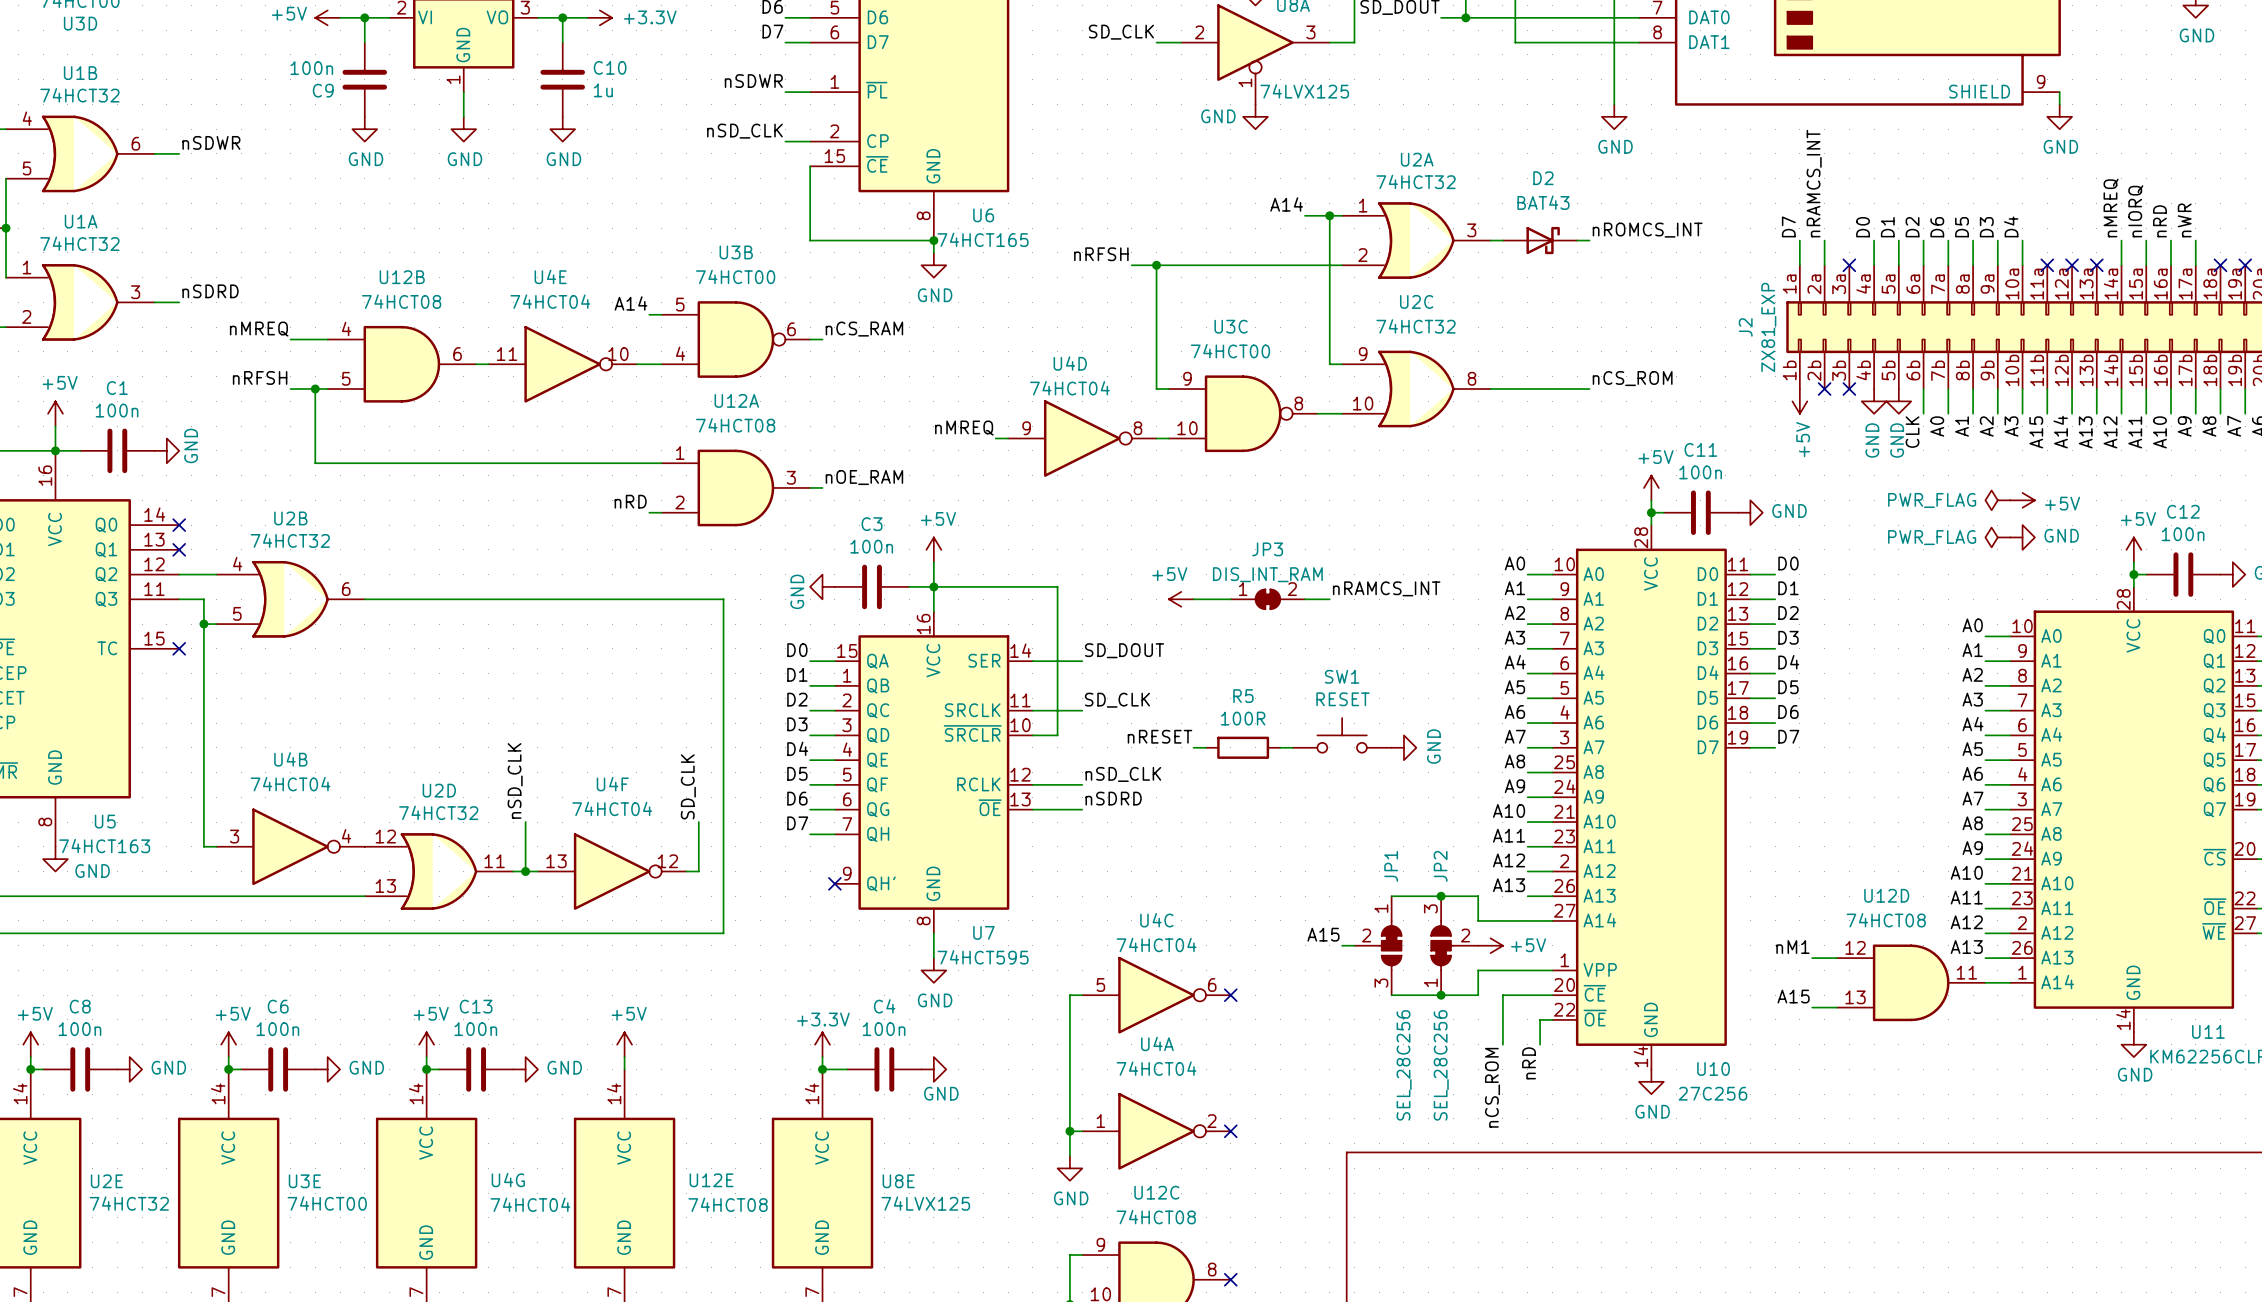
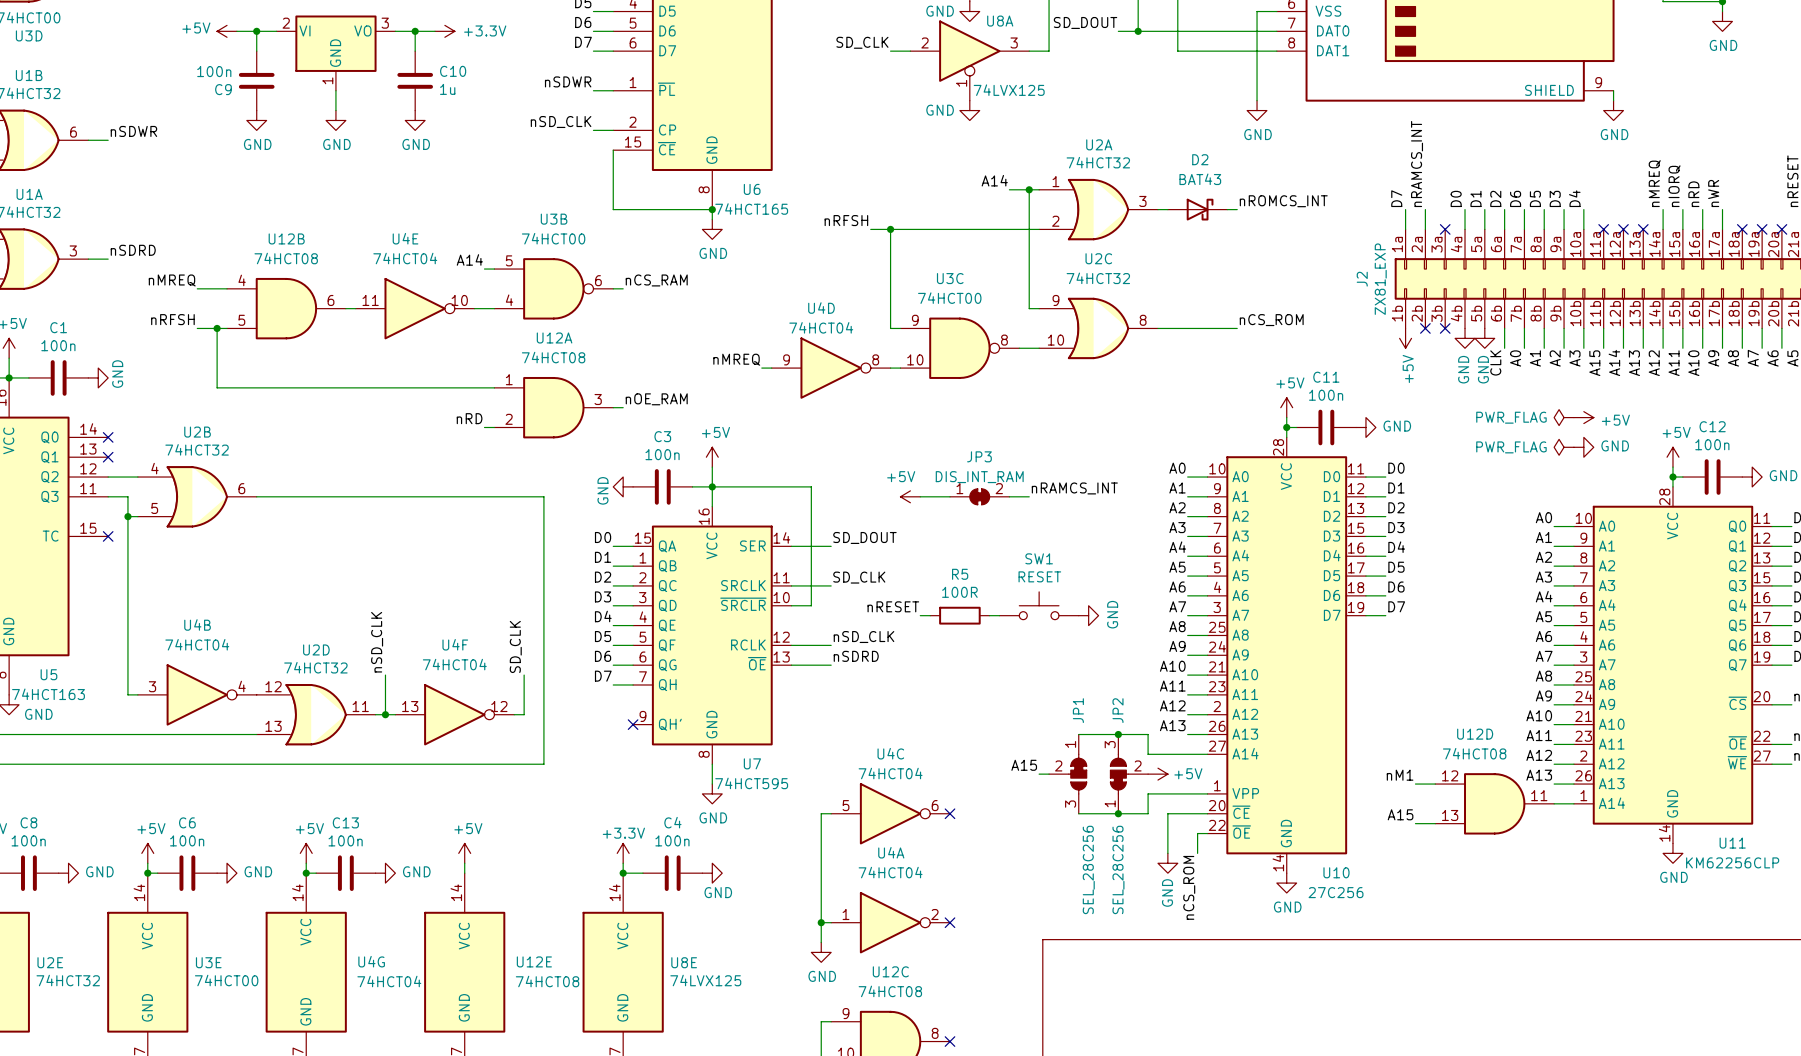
power symbol: none -> GND (1167, 863)
label: nRD (1529, 1063) -> nCS_ROM (1189, 887)
label: nCS_ROM (1492, 1087) -> none

